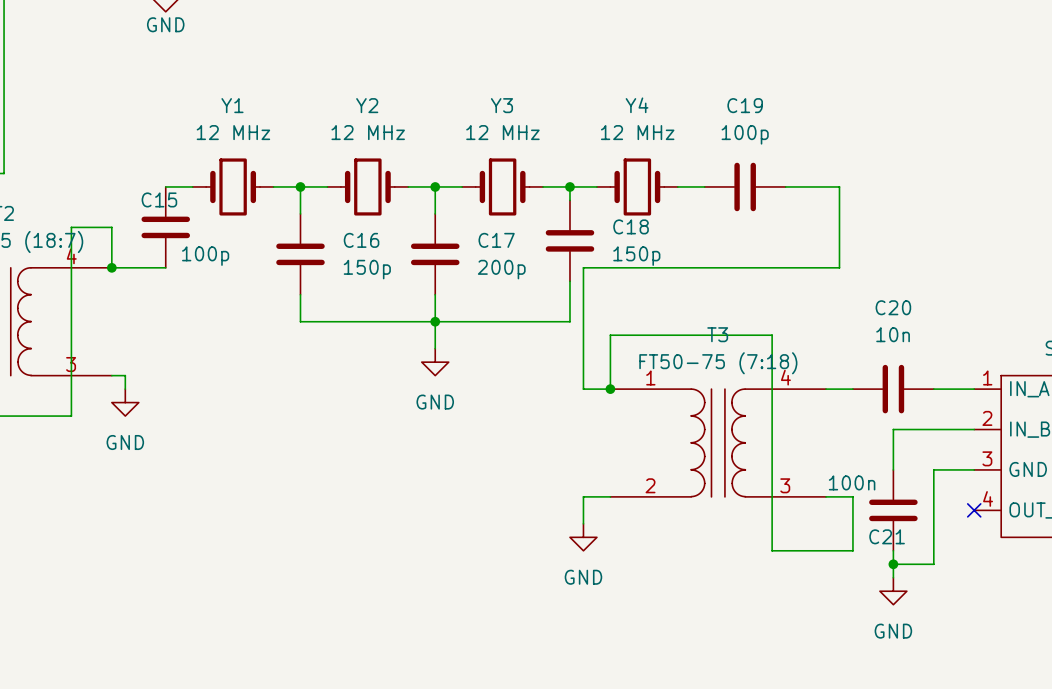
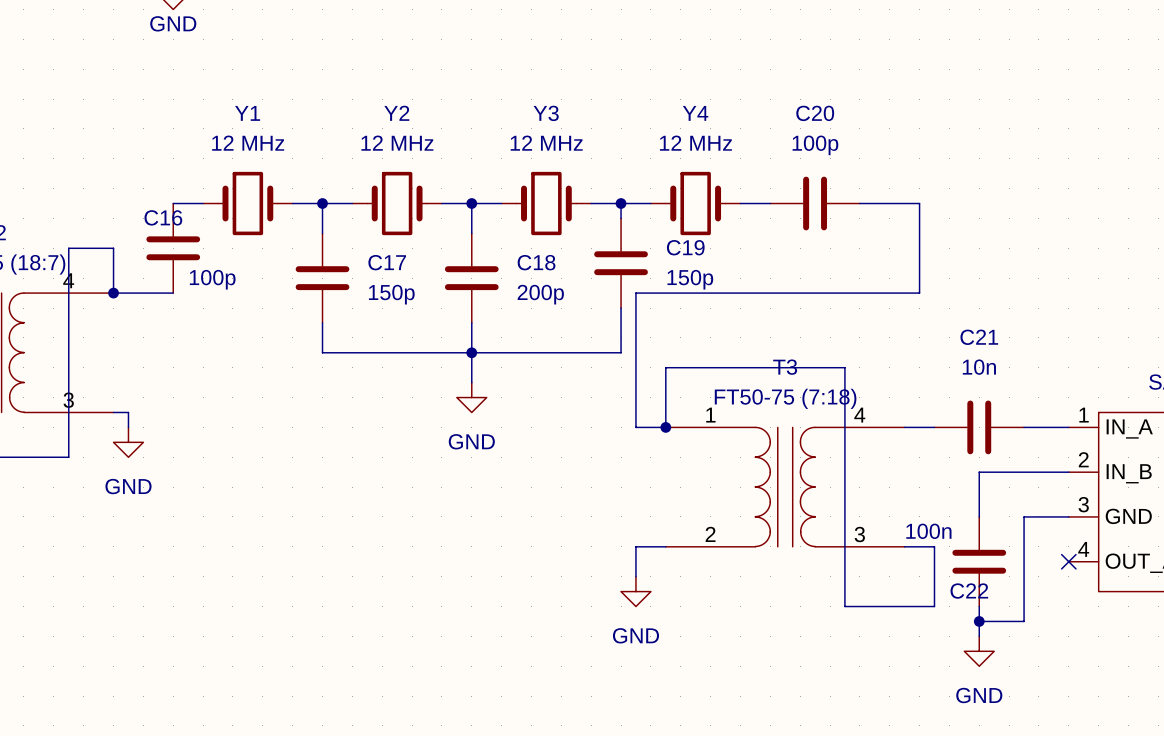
C19 name: C19 (745, 105) -> C20 (815, 113)
C15 name: C15 (159, 199) -> C16 (163, 217)
C18 name: C18 (631, 226) -> C19 (685, 247)
C16 name: C16 (361, 240) -> C17 (387, 262)
C17 name: C17 (496, 240) -> C18 (536, 262)
C20 name: C20 (893, 307) -> C21 (979, 337)
C21 name: C21 (887, 536) -> C22 (969, 591)

